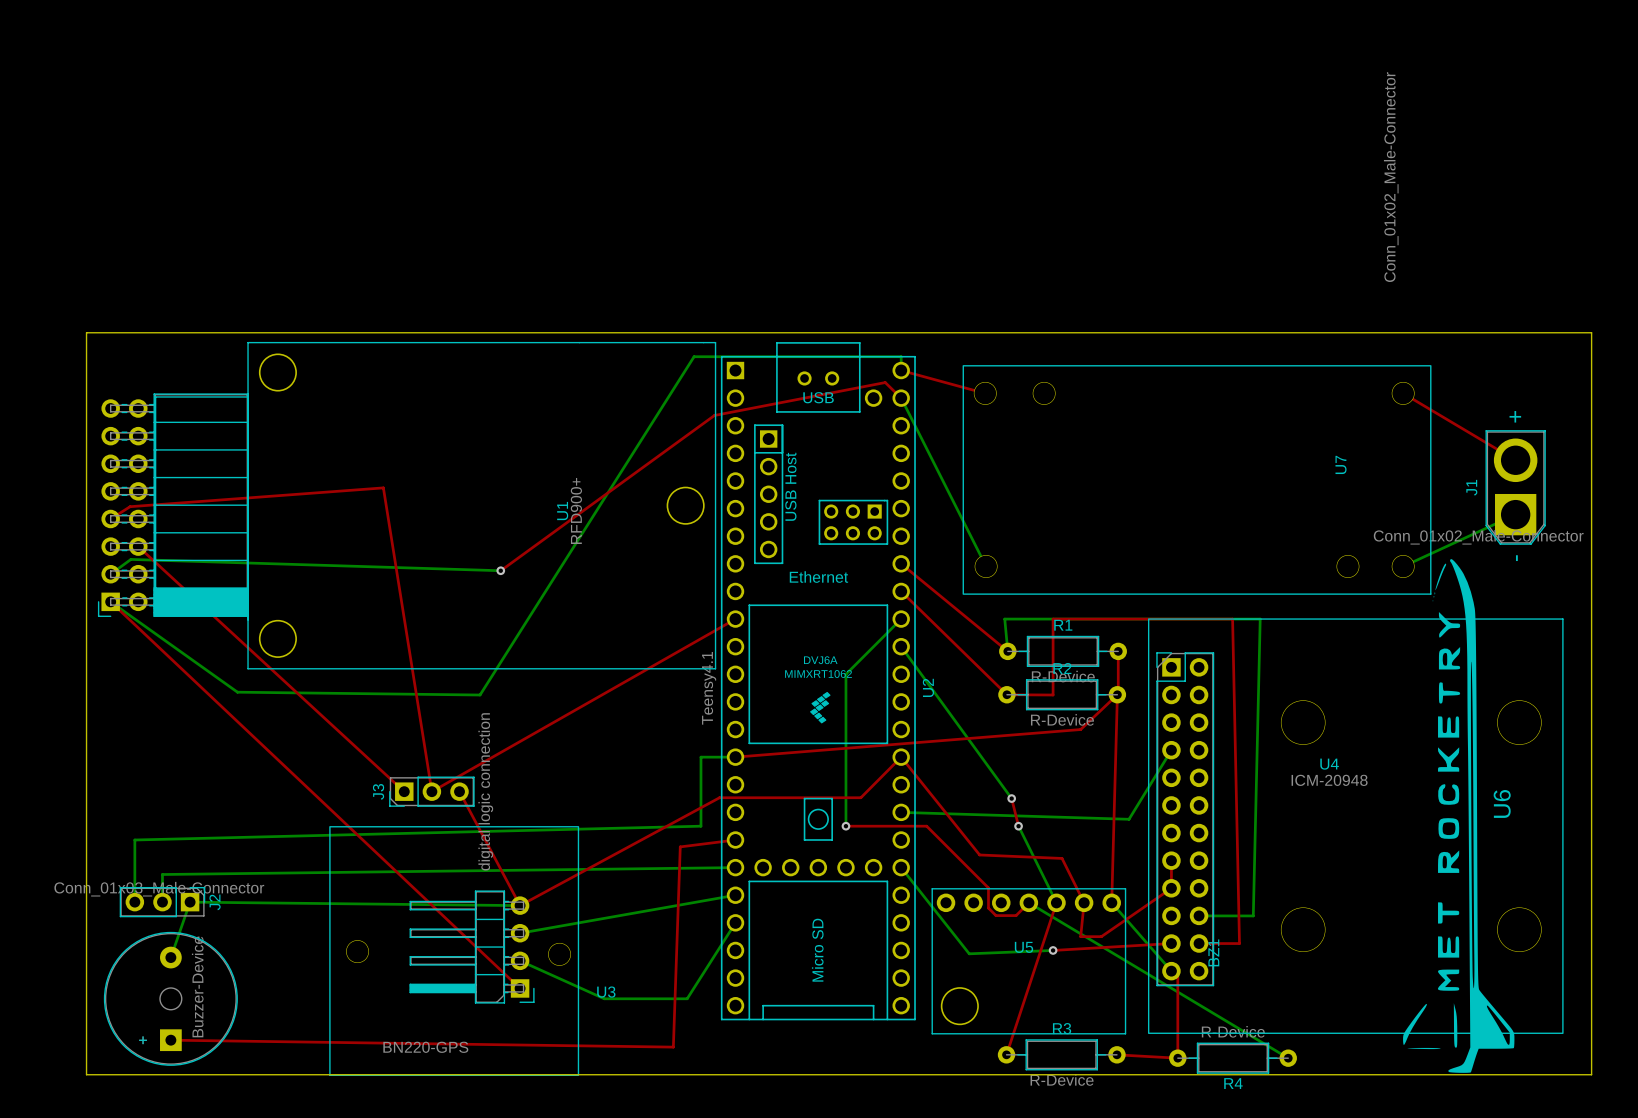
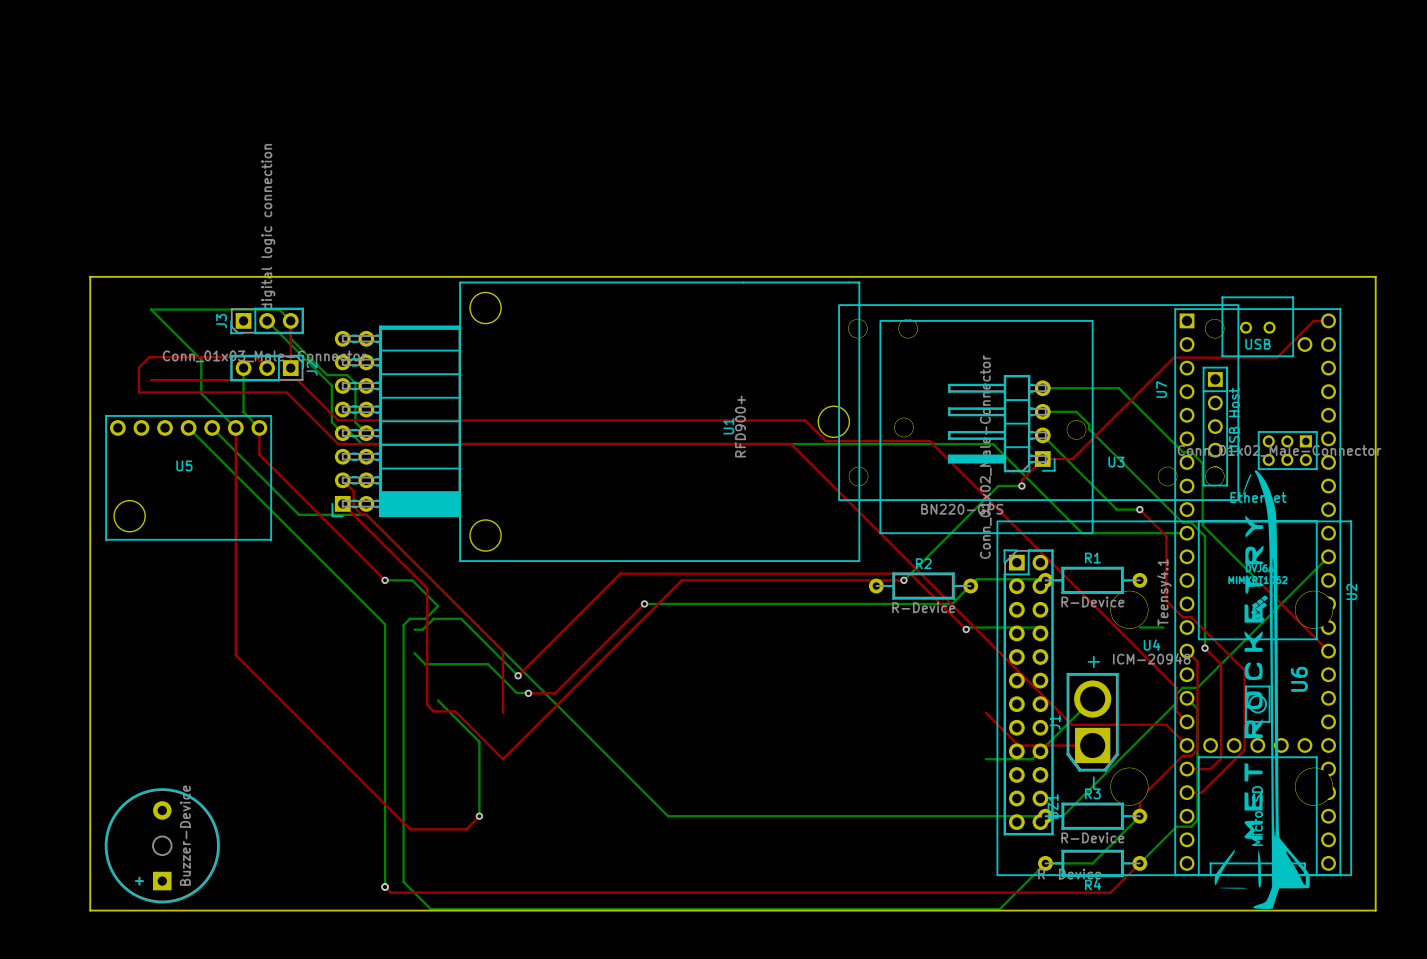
top track: (901, 370) (985, 393) -> none
bottom track: (901, 370) (901, 356) (694, 356) (480, 695) (237, 692) (110, 601) -> none
bottom track: none -> (267, 320) (331, 385) (331, 422) (342, 433) (350, 433) (361, 444) (993, 444) (1082, 533) (1187, 533)
top track: none -> (290, 320) (290, 368)
top track: none -> (1328, 320) (1313, 320) (1277, 357) (1173, 357) (1072, 459) (1042, 459) (1021, 479) (1021, 486)
top track: (1403, 393) (1515, 460) -> none
top track: (901, 398) (885, 382) (714, 415) (500, 570) -> none
bottom track: (901, 398) (986, 566) -> none
bottom track: none -> (243, 368) (243, 412) (259, 427)
top track: none -> (267, 368) (256, 357) (149, 357) (138, 367) (138, 392) (286, 392) (338, 444) (791, 444) (1072, 724) (1166, 724) (1187, 745)
top track: none -> (151, 380) (297, 380) (338, 420) (805, 420) (825, 441) (929, 441) (1176, 687) (1176, 711) (1187, 721)
bottom track: none -> (1042, 388) (1118, 388) (1182, 451) (1191, 451) (1202, 463) (1202, 525) (1257, 580)
J1 position: (1515, 487) -> (1092, 722)
bottom track: none -> (1042, 411) (1076, 411) (1089, 424) (1089, 429) (1182, 522) (1191, 522) (1205, 536) (1205, 648)
U1 position: (407, 505) -> (595, 421)
bottom track: none -> (188, 427) (385, 624) (385, 886)
bottom track: none -> (212, 427) (299, 514) (366, 514) (668, 816) (1062, 816) (1176, 702) (1176, 693) (1182, 687) (1197, 687) (1328, 556)
top track: none -> (235, 427) (235, 655) (409, 829) (466, 829) (479, 816)
bottom track: none -> (235, 427) (201, 393) (201, 359) (151, 309) (279, 309) (290, 320) (290, 338) (327, 375) (347, 375) (355, 383) (355, 422) (366, 433)
top track: none -> (259, 427) (259, 454) (385, 580)
bottom track: (1515, 514) (1403, 566) -> none
top track: (110, 518) (130, 506) (383, 487) (431, 791) (735, 619) -> none
bottom track: none -> (1042, 435) (1116, 509) (1139, 509)
top track: (138, 546) (404, 791) -> none
top track: (901, 563) (1007, 651) -> none
bottom track: (500, 570) (130, 559) (110, 574) -> none
via: (500, 570) -> none
top track: none -> (337, 486) (348, 486) (353, 491) (353, 506) (361, 514) (366, 514) (503, 651) (503, 712)
bottom track: none -> (1021, 486) (998, 486) (903, 580)
via: none -> (1021, 486)
top track: (901, 591) (1006, 694) (1053, 695) (1053, 619) (1232, 619) (1239, 943) (1199, 943) -> none
top track: none -> (342, 503) (427, 588) (427, 704) (433, 711) (455, 711) (503, 759) (681, 580) (903, 580)
top track: (110, 601) (520, 988) -> none
top track: none -> (1139, 509) (1166, 536) (1166, 600) (1182, 617) (1191, 617) (1244, 670) (1244, 749) (1201, 792) (1187, 792)
via: none -> (1139, 509)
bottom track: (901, 619) (845, 674) (845, 826) -> none
bottom track: (901, 646) (1011, 798) -> none
bottom track: (1007, 651) (1004, 619) (1260, 619) (1253, 915) (1199, 915) -> none
R1 position: (1063, 651) -> (1092, 580)
top track: (1118, 651) (1117, 694) -> none
top track: none -> (910, 573) (620, 573) (518, 675)
top track: none -> (910, 573) (966, 629)
U2 position: (818, 681) -> (1257, 586)
bottom track: none -> (385, 580) (412, 580) (438, 606) (425, 618) (409, 618) (403, 625) (403, 881) (430, 909) (999, 909) (1045, 863) (1092, 863) (1139, 816)
via: none -> (385, 580)
via: none -> (903, 580)
bottom track: none -> (1045, 580) (976, 579) (952, 603) (644, 603)
top track: none -> (1257, 580) (1328, 651)
top track: (1117, 694) (1111, 902) -> none
top track: (1117, 694) (1080, 729) (735, 757) -> none
top track: none -> (644, 603) (555, 693) (528, 693)
via: none -> (644, 603)
bottom track: none -> (1045, 627) (968, 627) (966, 629)
bottom track: none -> (1139, 627) (1163, 627)
bottom track: none -> (414, 629) (422, 629) (433, 618) (461, 618) (518, 675)
via: none -> (966, 629)
bottom track: (1171, 750) (1129, 819) (901, 812) -> none
bottom track: (735, 757) (700, 757) (700, 826) (134, 839) (134, 902) -> none
top track: none -> (1205, 648) (1221, 664) (1221, 758) (1210, 769) (1187, 769)
via: none -> (1205, 648)
top track: none -> (1187, 651) (1197, 661) (1197, 749) (1191, 755) (1182, 755) (1139, 798) (1139, 816)
bottom track: none -> (414, 653) (425, 664) (488, 664) (516, 693) (528, 693)
J3 position: (431, 791) -> (267, 320)
top track: (459, 791) (520, 905) (719, 797) (860, 797) (901, 757) (979, 854) (1062, 858) (1084, 902) (1080, 936) (1101, 936) (1171, 888) (1171, 860) -> none
J3 value position: digital logic connection (485, 791) -> digital logic connection (268, 226)
top track: (1011, 798) (1018, 826) -> none
via: (1011, 798) -> none
via: none -> (518, 675)
via: none -> (528, 693)
top track: (845, 826) (926, 826) (988, 887) (988, 908) (995, 915) (1016, 915) (1028, 902) -> none
via: (845, 826) -> none
bottom track: (1018, 826) (1056, 902) -> none
via: (1018, 826) -> none
bottom track: none -> (1187, 698) (1197, 708) (1197, 820) (1191, 826) (1176, 826) (1139, 863)
bottom track: none -> (1092, 699) (1032, 759) (985, 759)
bottom track: none -> (438, 700) (479, 741) (479, 816)
top track: (735, 839) (680, 846) (673, 1047) (170, 1040) -> none
top track: none -> (985, 712) (1018, 745) (1092, 745)
bottom track: (735, 867) (162, 874) (162, 902) -> none
bottom track: (901, 867) (969, 953) (1053, 950) -> none
bottom track: (735, 895) (520, 933) -> none
J2 position: (162, 902) -> (267, 368)
bottom track: (1028, 902) (1288, 1058) -> none
top track: (1056, 902) (1006, 1054) -> none
bottom track: (1111, 902) (1171, 971) -> none
bottom track: (520, 905) (190, 902) (170, 957) -> none
bottom track: (735, 922) (687, 998) (604, 998) (520, 960) -> none
top track: (1171, 943) (1053, 950) -> none
via: (1053, 950) -> none
U3 position: (454, 951) -> (986, 427)
U5 position: (1028, 961) -> (188, 477)
via: none -> (479, 816)
top track: (1171, 971) (1177, 977) (1177, 1058) (1116, 1054) -> none
top track: none -> (1139, 863) (1110, 892) (390, 892) (385, 886)
via: none -> (385, 886)
R3 position: (1061, 1054) -> (1092, 816)
R4 position: (1233, 1058) -> (1092, 863)

